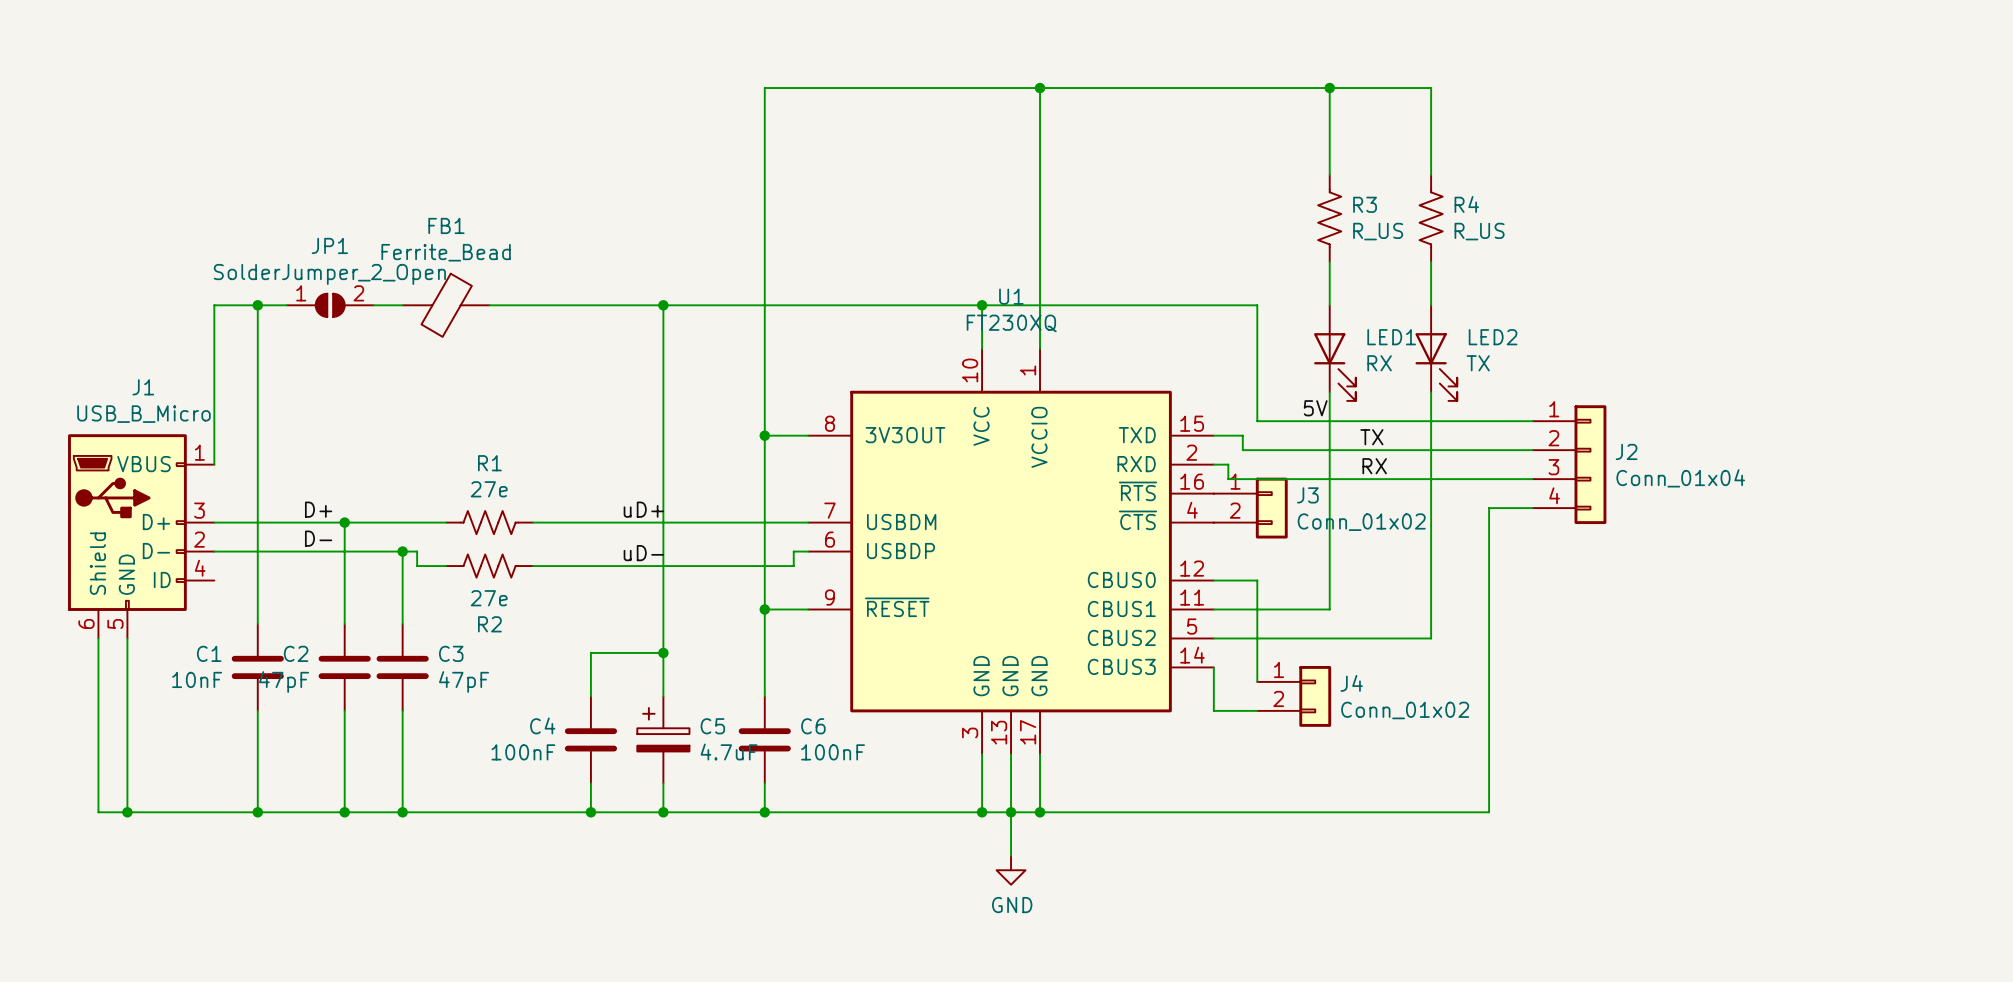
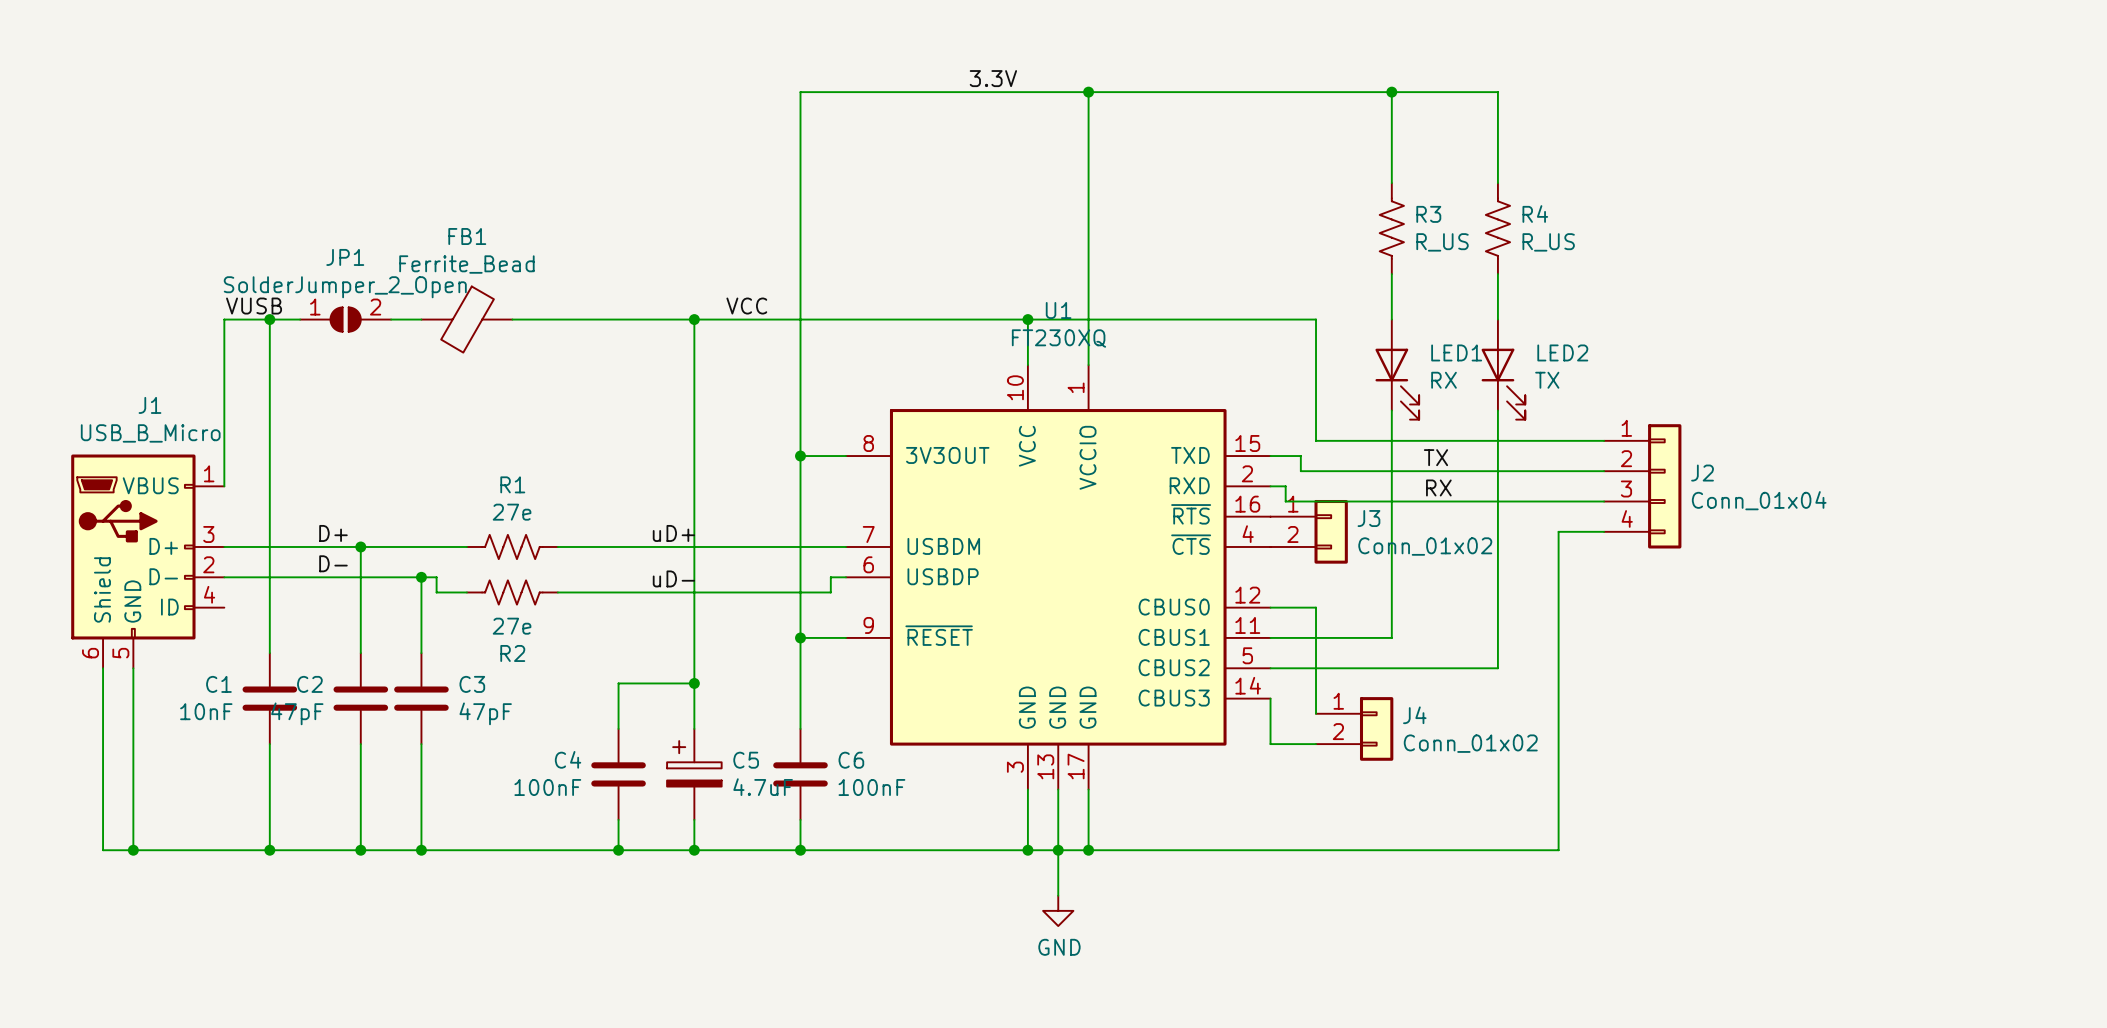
label: none -> 3.3V (993, 78)
label: none -> VUSB (254, 306)
label: none -> VCC (746, 306)
label: 5V (1315, 408) -> none

